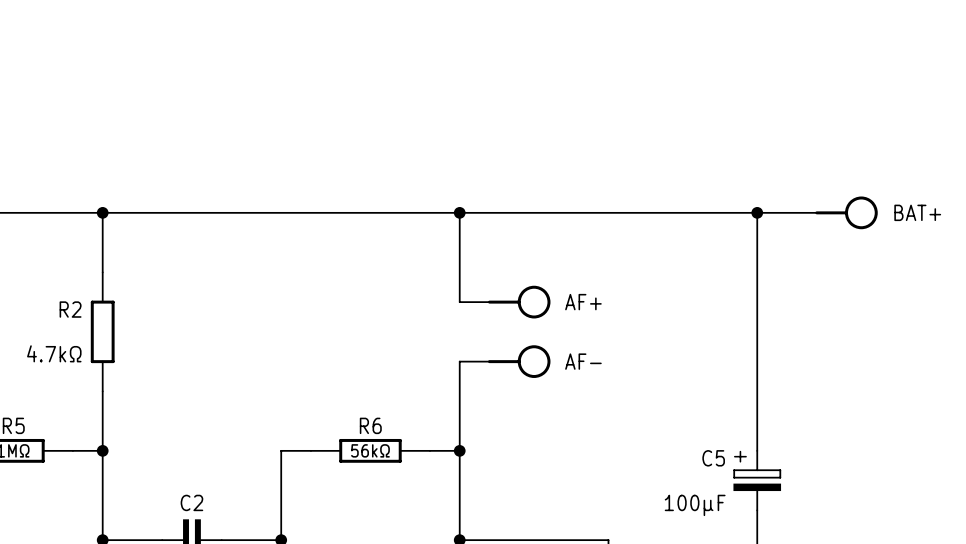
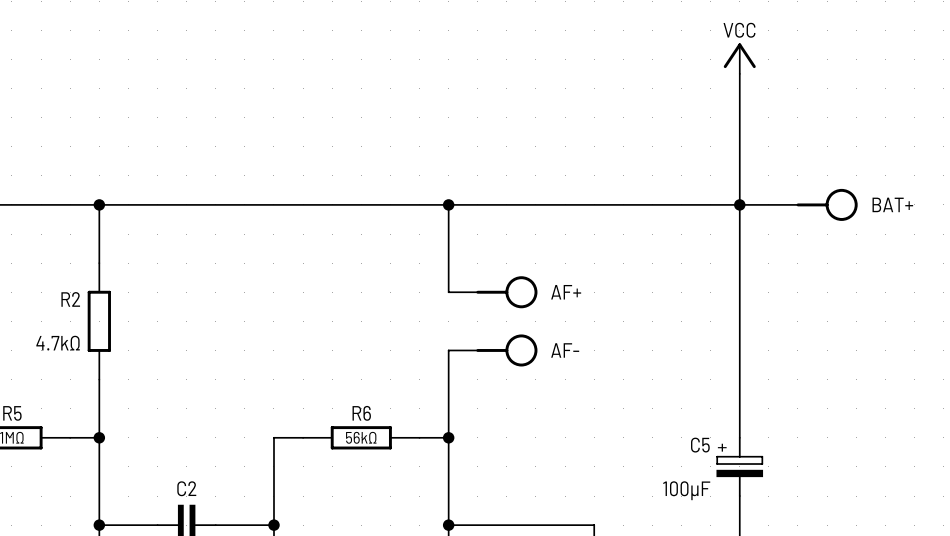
power symbol: none -> VCC (739, 58)
wire: none -> (739, 73) (739, 204)

